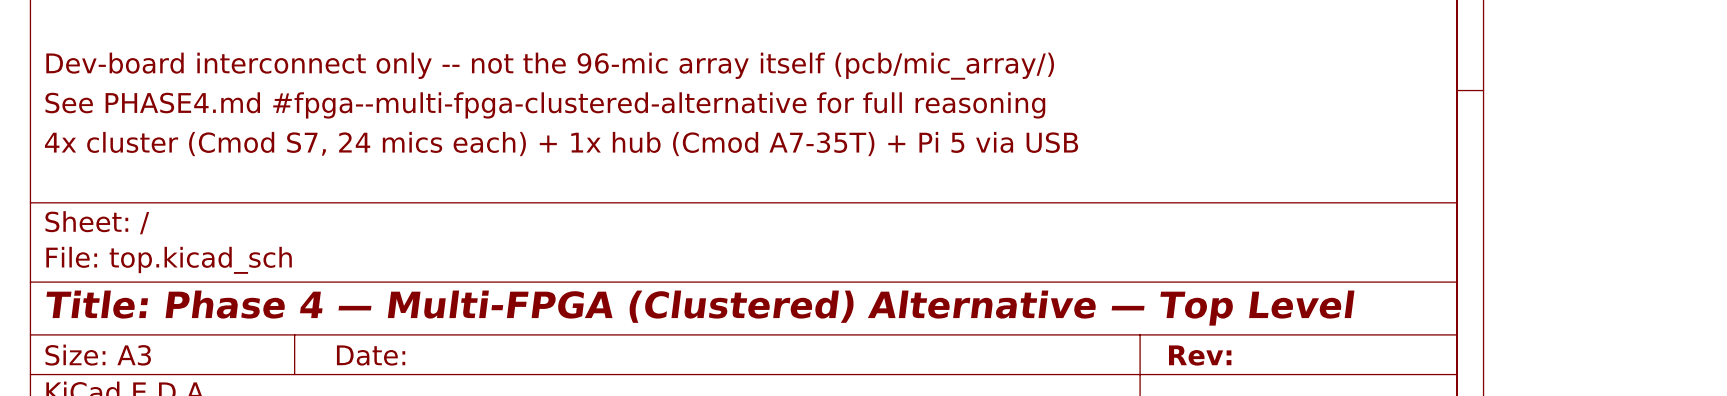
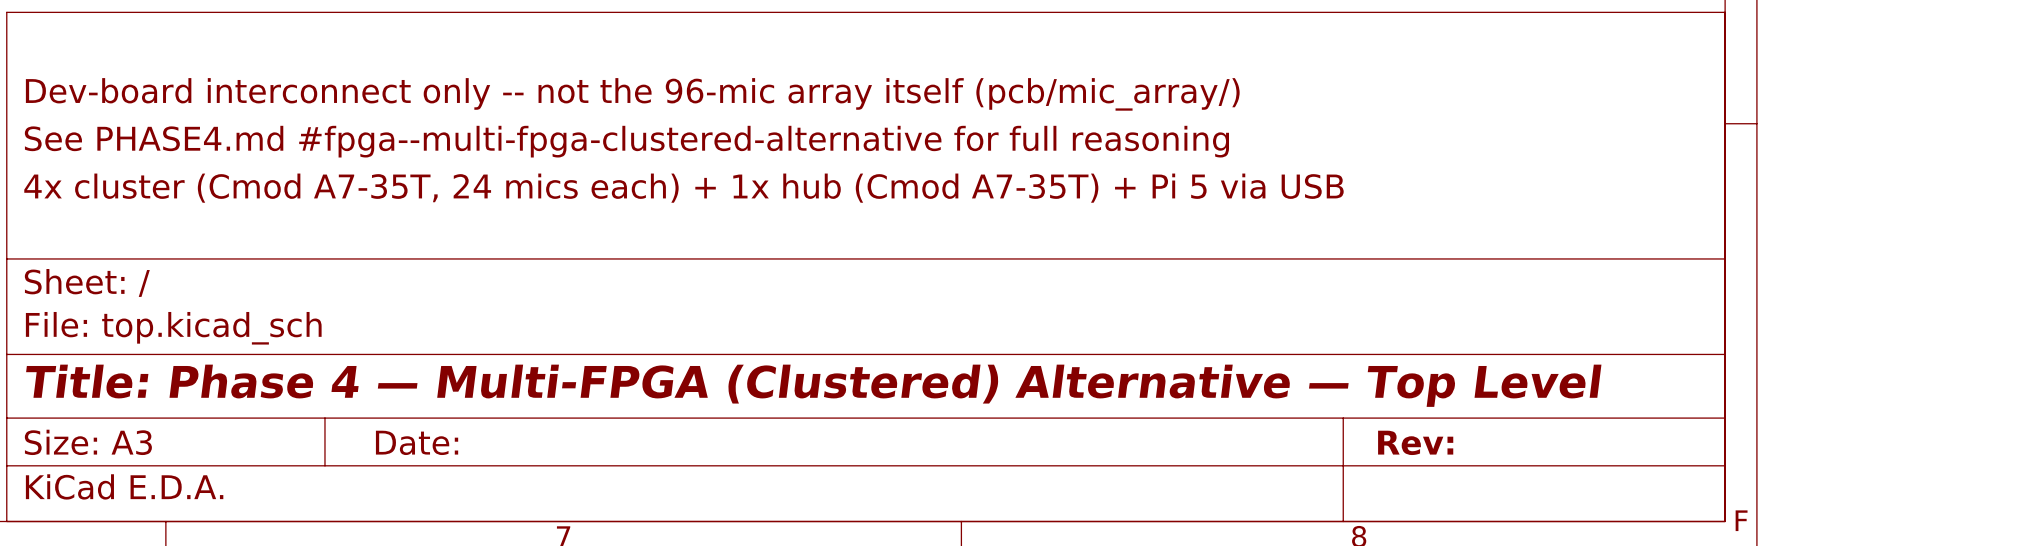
title block: 4x cluster (Cmod S7, 24 mics each) + 1x hub (Cmod A7-35T) + Pi 5 via USB (561, 144) -> 4x cluster (Cmod A7-35T, 24 mics each) + 1x hub (Cmod A7-35T) + Pi 5 via USB (683, 188)

